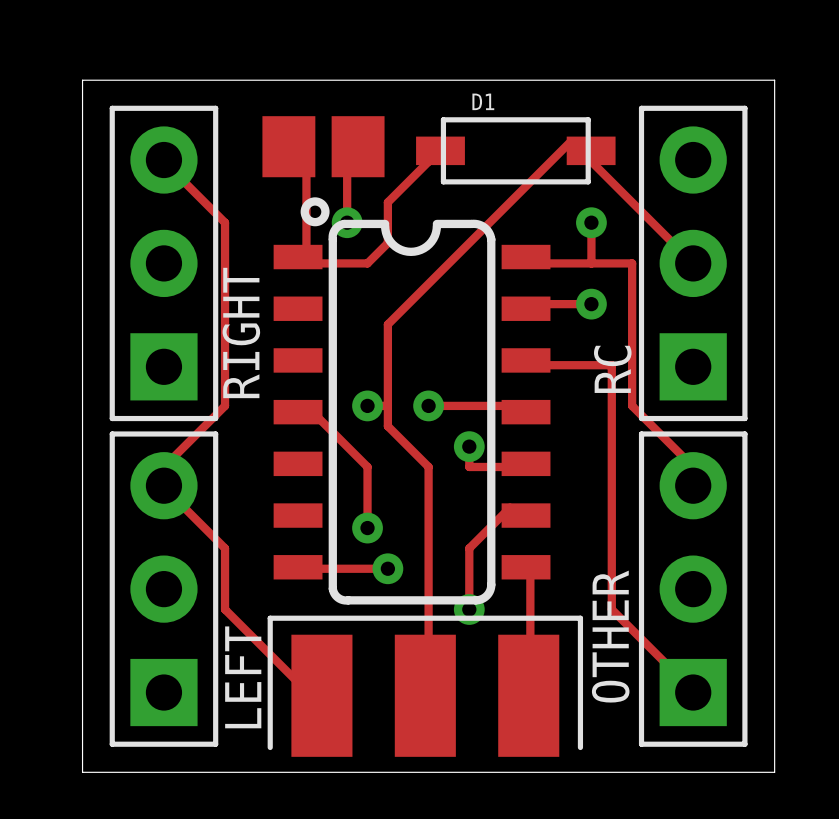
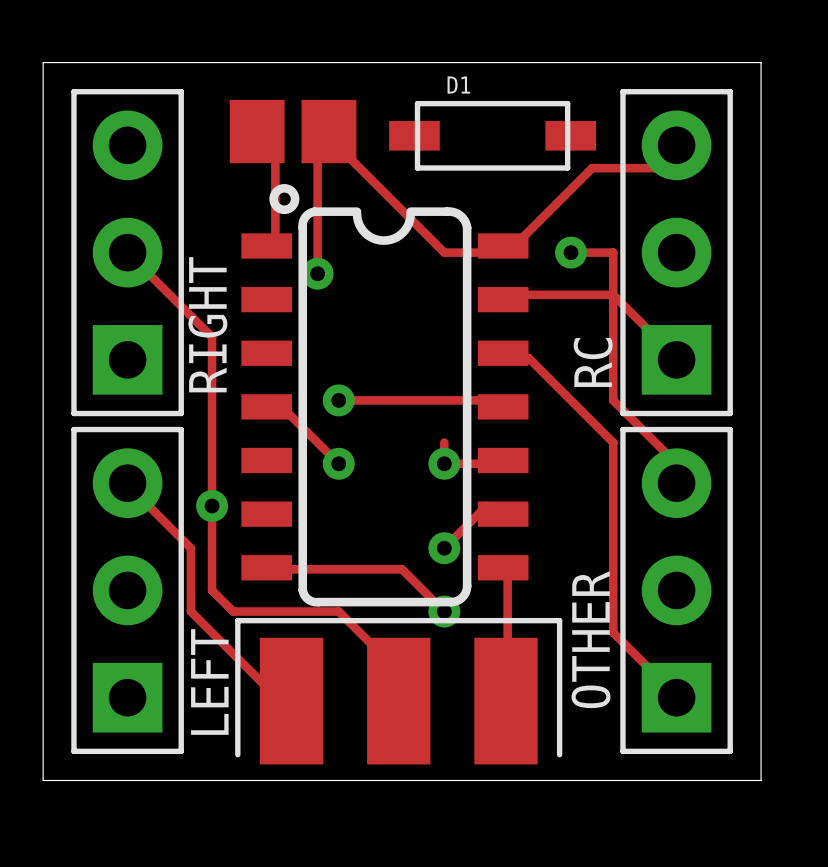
track: none -> (328, 131) (338, 147) (444, 252) (486, 252) (503, 245)
track: (440, 150) (387, 202) (387, 243) (367, 263) (306, 263) -> none
track: (163, 160) (225, 222) (225, 405) (163, 466) (163, 485) -> none
via position: (347, 222) -> (317, 273)
track: (591, 222) (591, 263) (530, 263) -> (676, 145) (655, 168) (592, 168) (507, 252)
via: (591, 222) -> none
via: none -> (571, 252)
track: (693, 263) (591, 161) (591, 150) (571, 141) (387, 324) (387, 426) (428, 466) (428, 690) (425, 695) -> (127, 252) (212, 337) (212, 590) (233, 611) (338, 611) (380, 653) (380, 696) (398, 701)
track: none -> (571, 294) (613, 294) (676, 359)
via: (591, 304) -> none
track: (550, 365) (611, 365) (611, 609) (632, 629) -> (528, 358) (613, 442) (613, 632)
track: none -> (359, 400) (402, 400)
via: (428, 405) -> none
via position: (469, 446) -> (444, 463)
track: (367, 466) (367, 528) -> (317, 210) (317, 273)
via: none -> (338, 463)
via: none -> (212, 505)
via: (367, 528) -> none
track: (469, 548) (469, 609) -> (359, 569) (402, 569) (444, 611)
via: none -> (444, 548)
via: (387, 568) -> none

